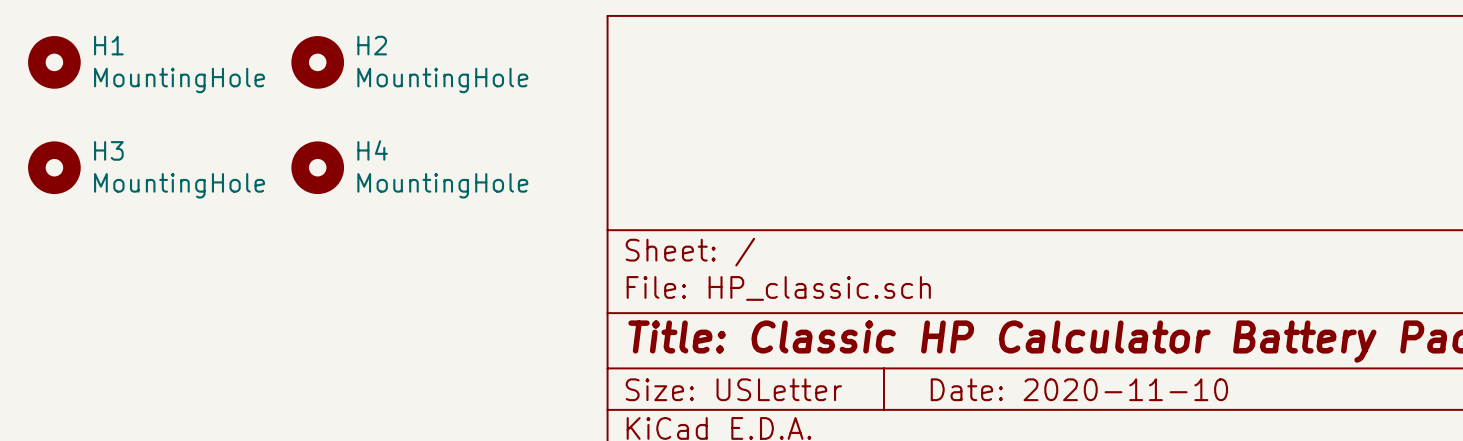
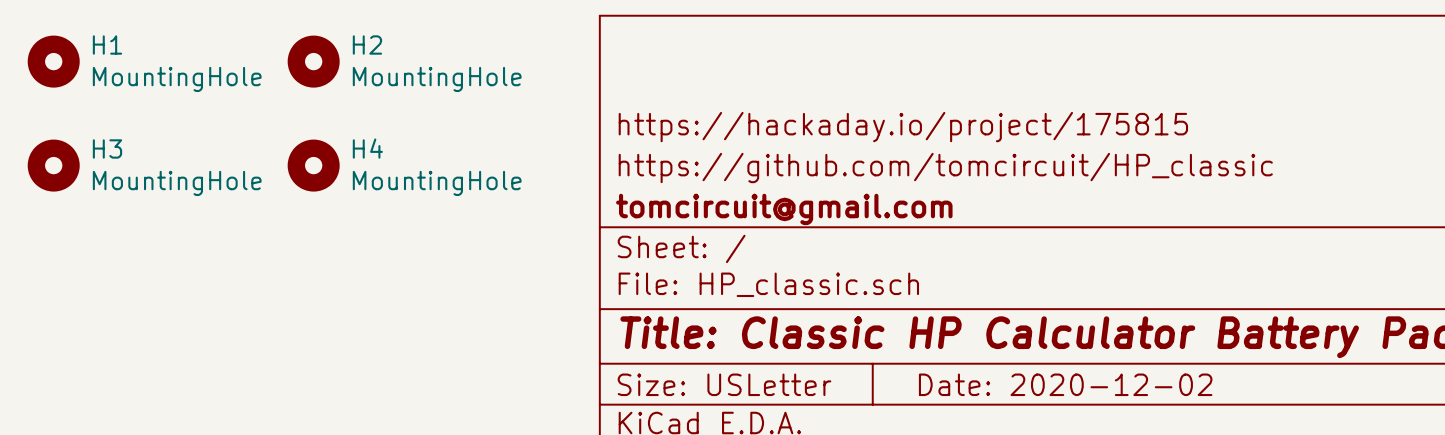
title block: none -> https://hackaday.io/project/175815 (903, 127)
title block: none -> https://github.com/tomcircuit/HP_classic (945, 168)
title block: none -> tomcircuit@gmail.com (784, 209)
title block: Date: 2020-11-10 (1079, 389) -> Date: 2020-12-02 (1065, 384)

